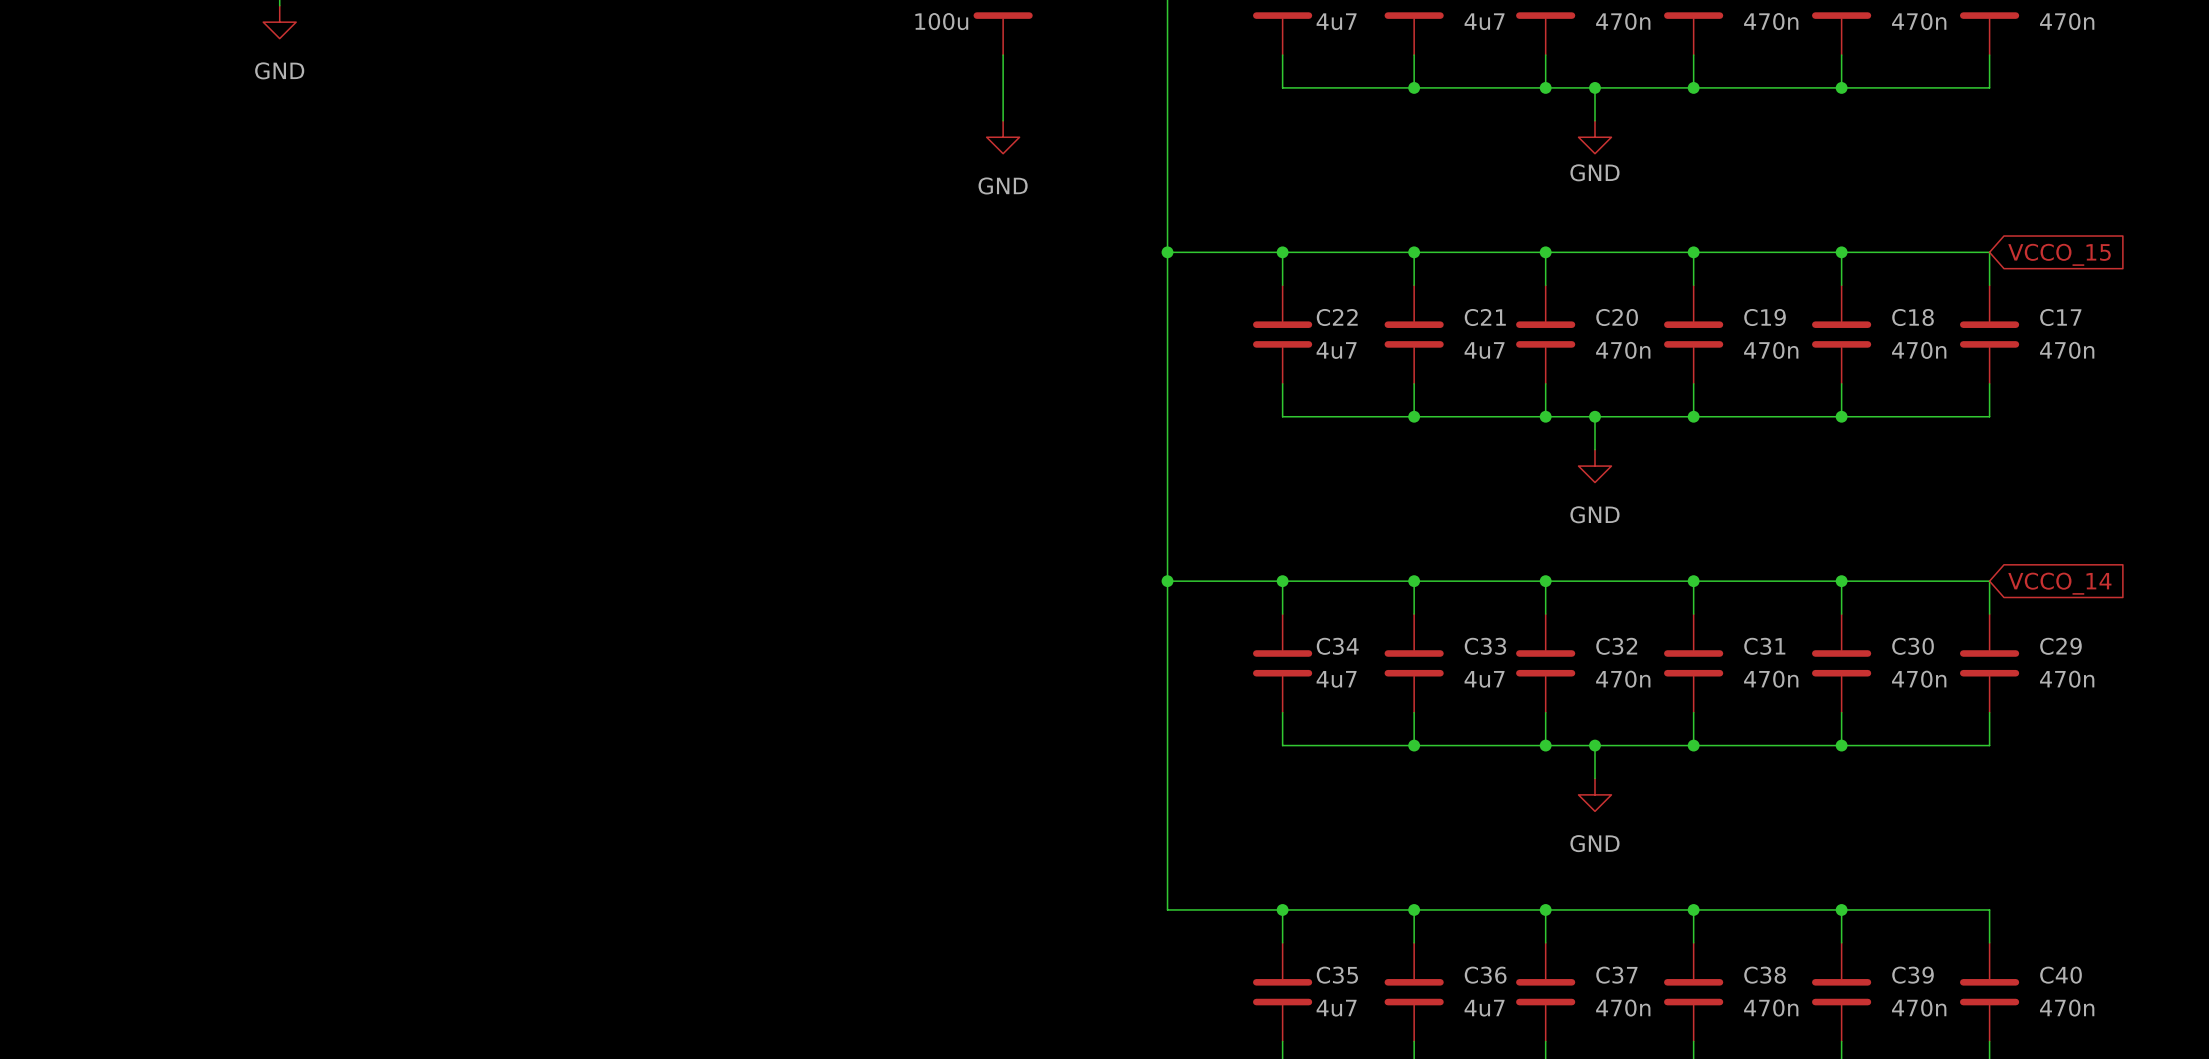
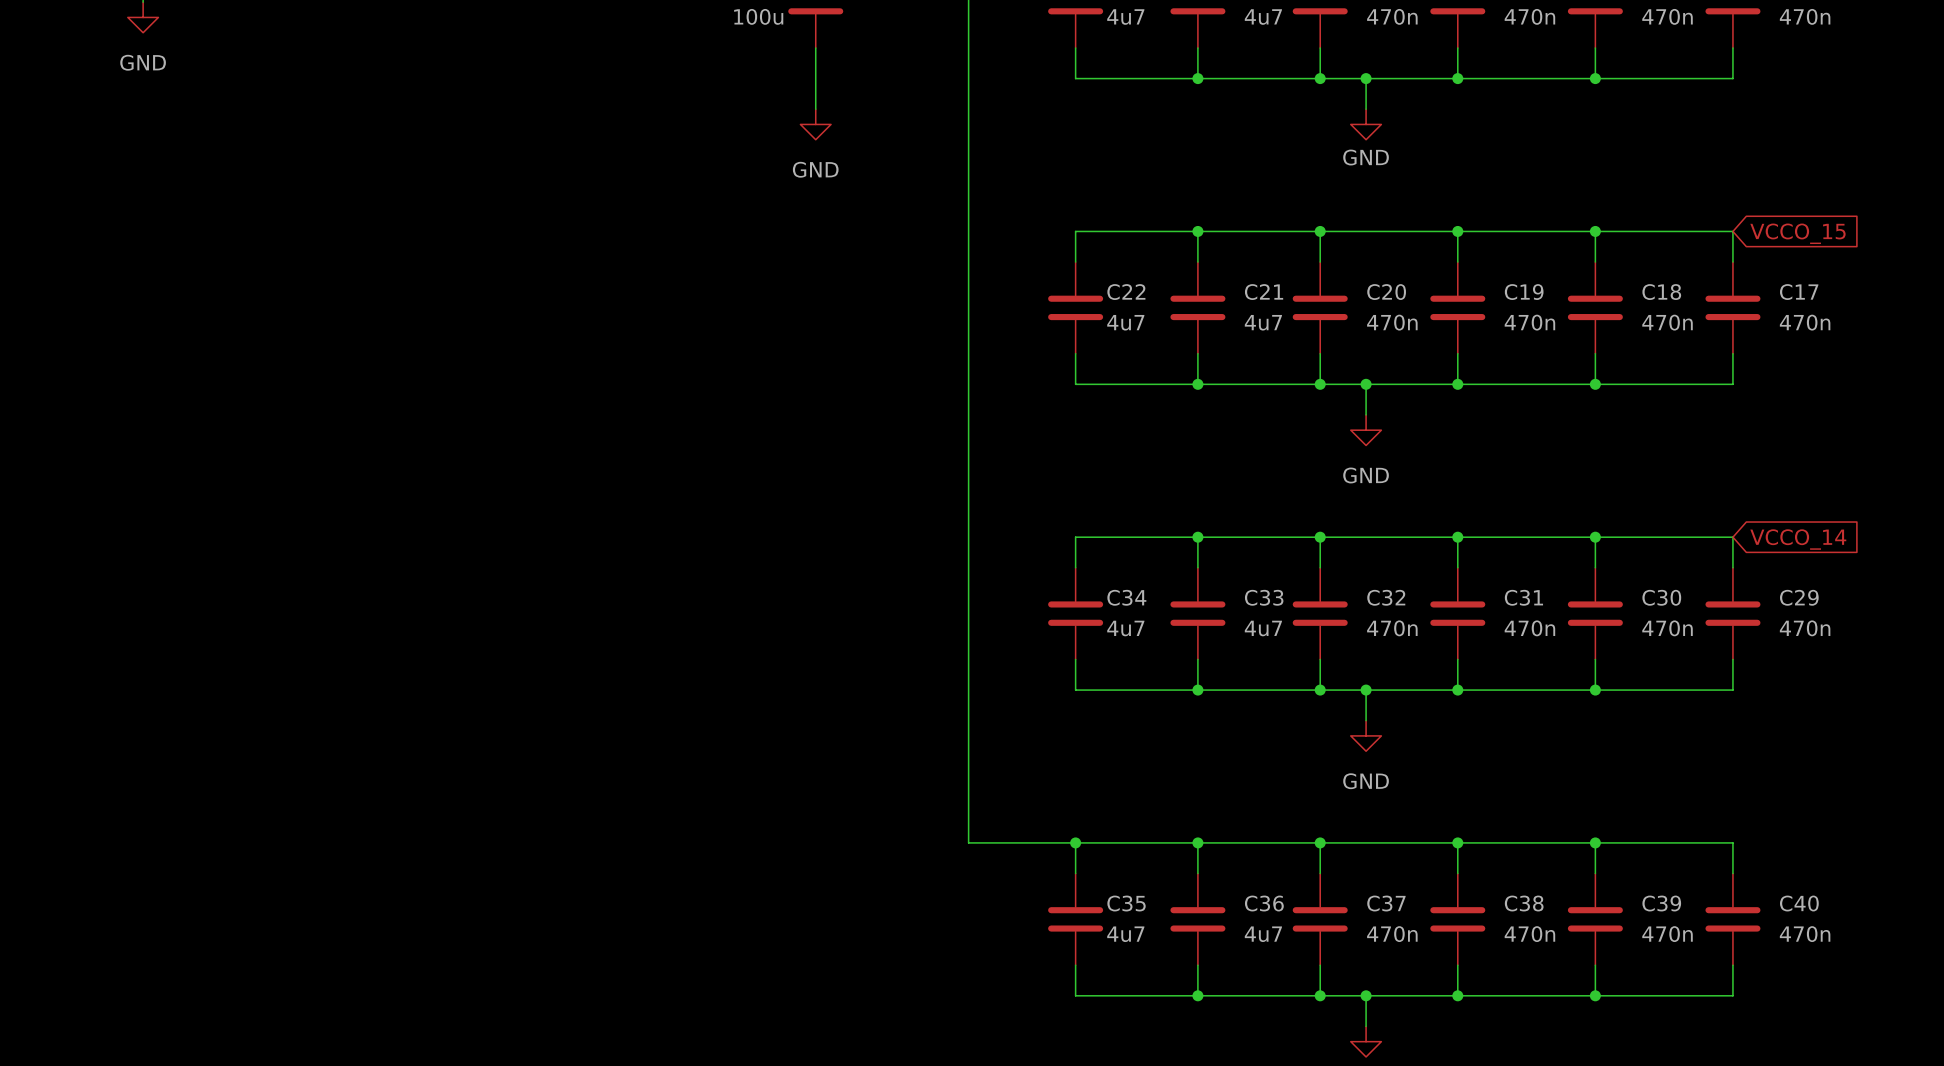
wire: (1167, 252) (1282, 252) -> none
junction: (1167, 252) -> none
junction: (1282, 252) -> none
wire: (1167, 581) (1282, 581) -> none
junction: (1167, 581) -> none
junction: (1282, 581) -> none

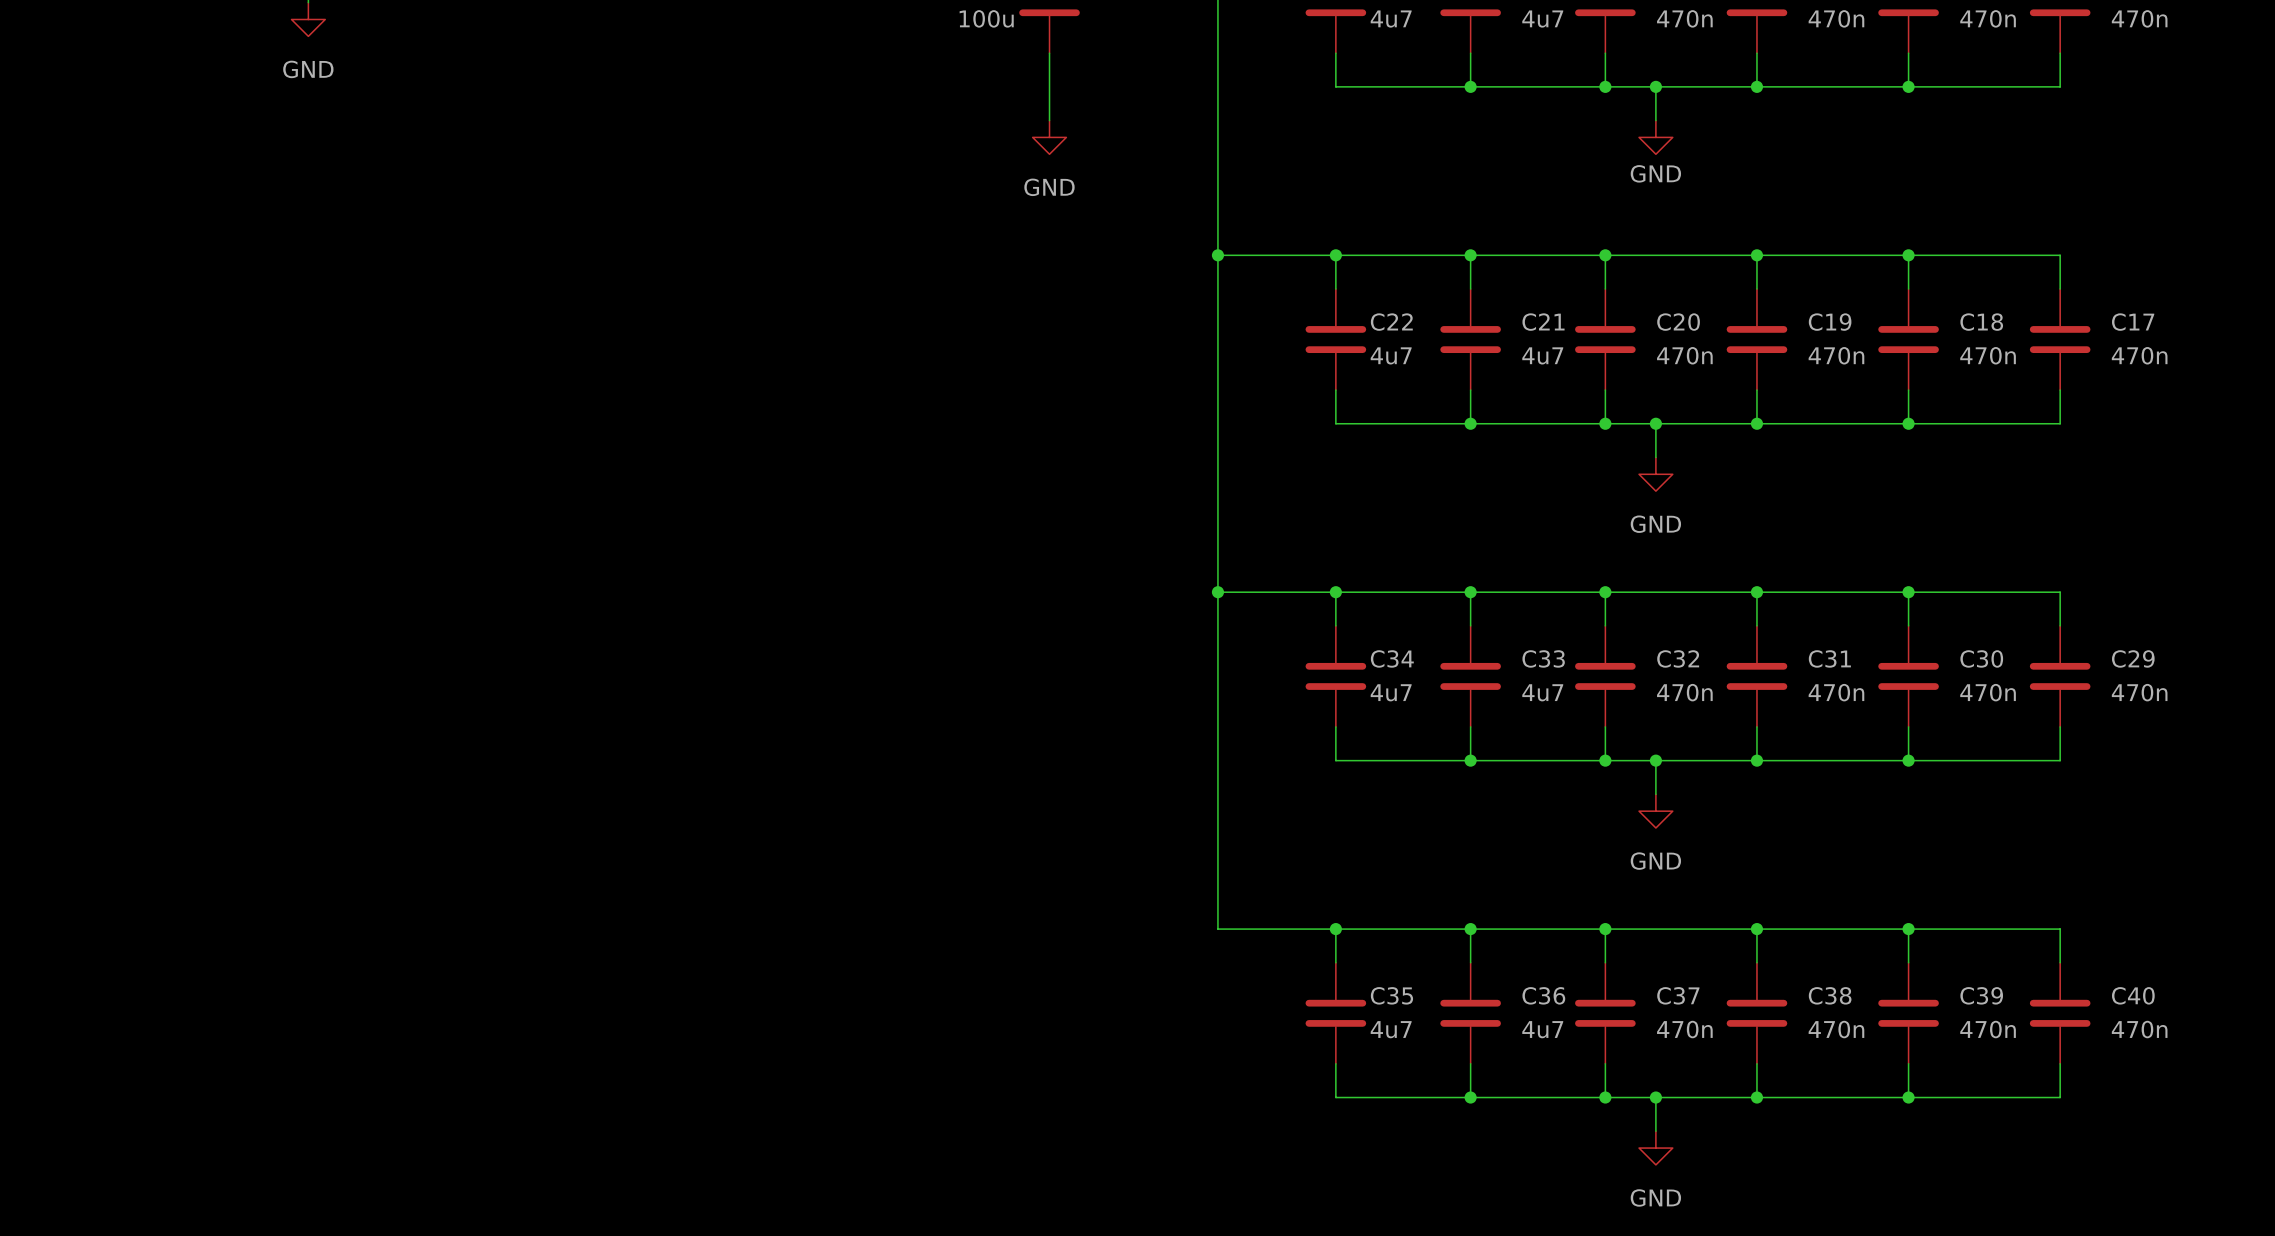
wire: none -> (1217, 255) (1335, 255)
junction: none -> (1217, 255)
junction: none -> (1335, 255)
global label: VCCO_15 (1797, 233) -> none
wire: none -> (1217, 592) (1335, 592)
junction: none -> (1217, 592)
junction: none -> (1335, 592)
global label: VCCO_14 (1798, 539) -> none

